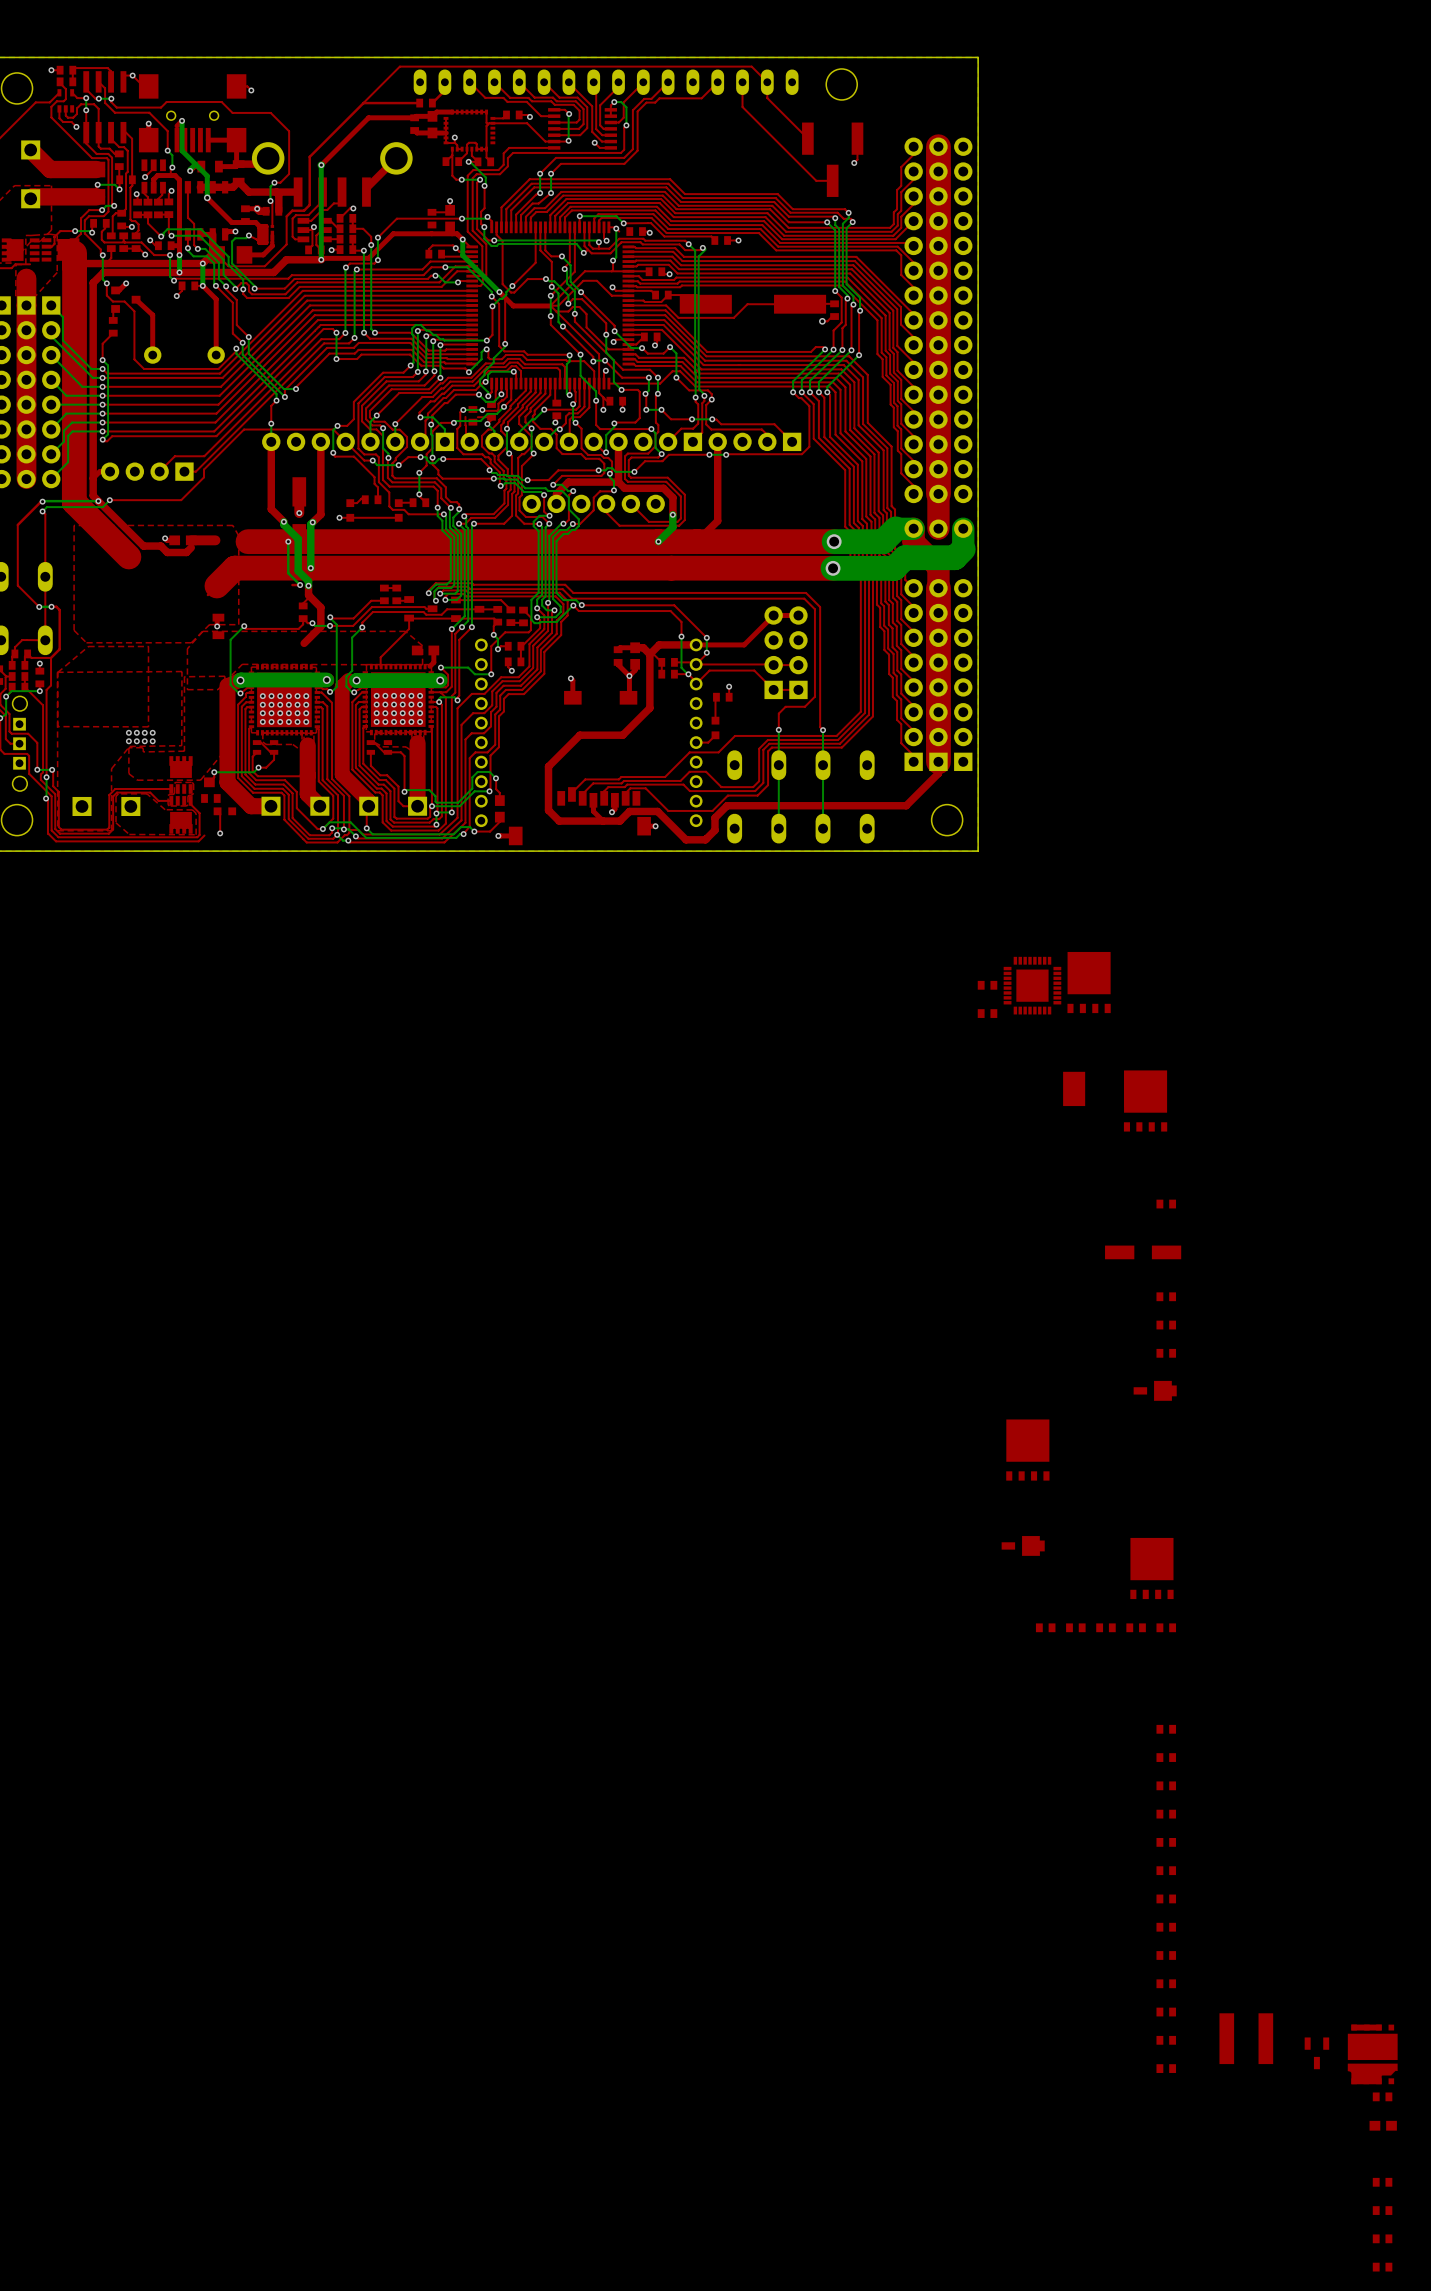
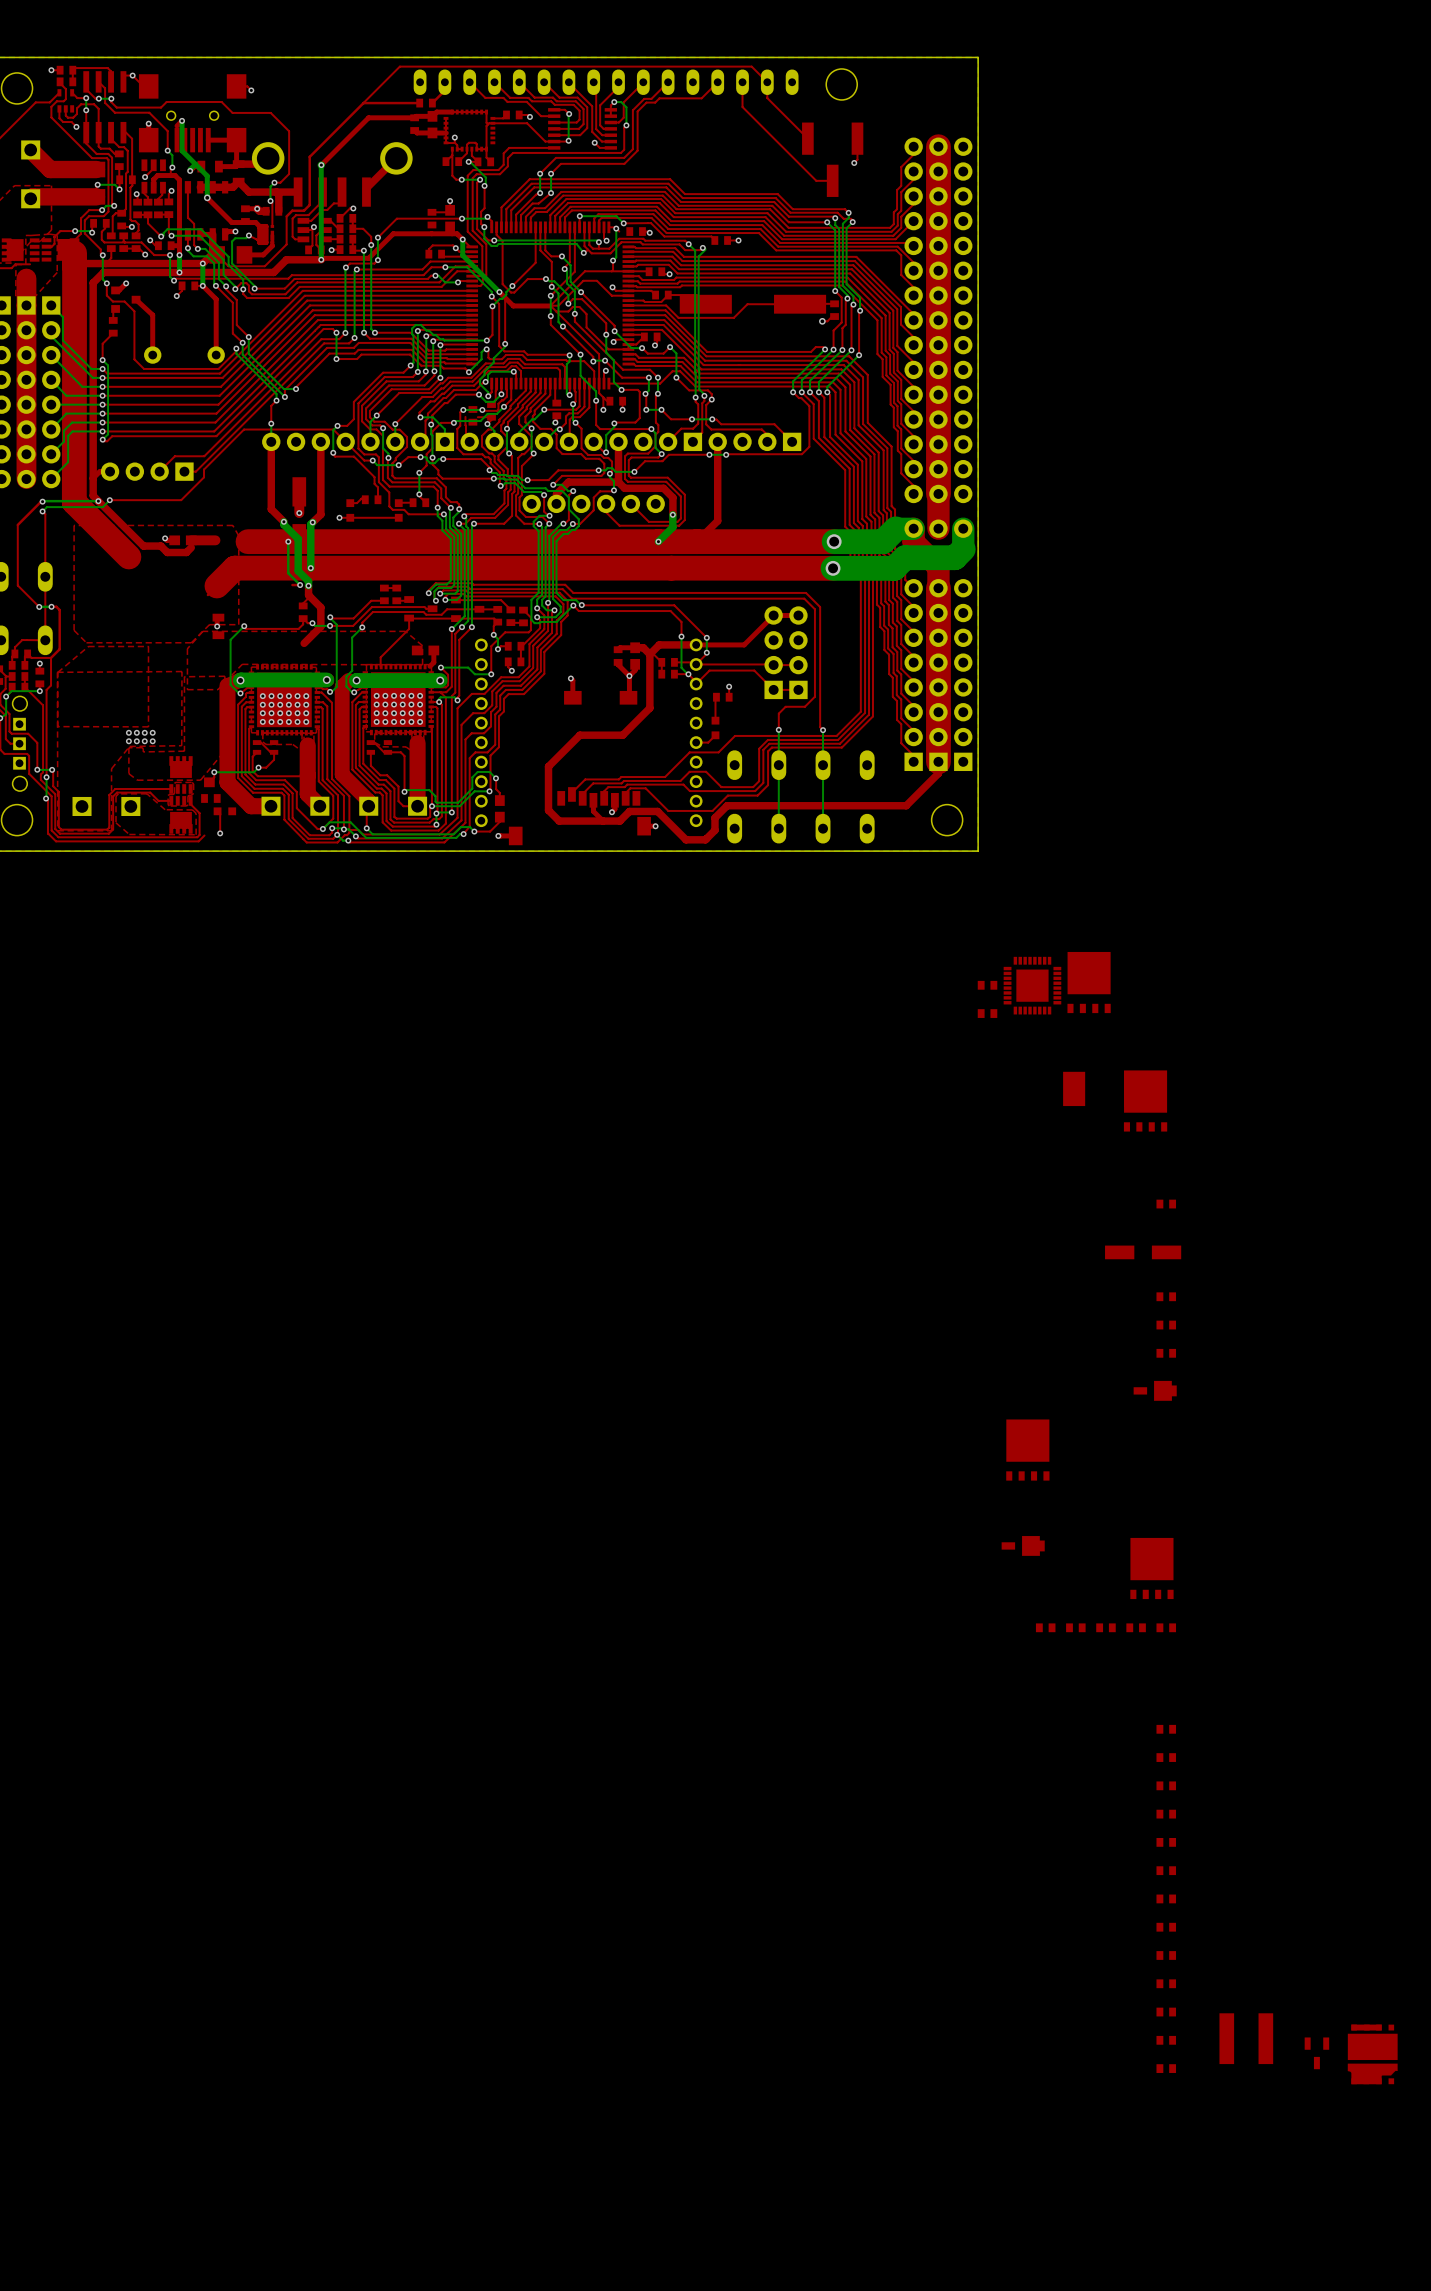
part: (1382, 2096) -> none
part: (1383, 2125) -> none
part: (1382, 2182) -> none
part: (1382, 2210) -> none
part: (1382, 2238) -> none
part: (1382, 2267) -> none

